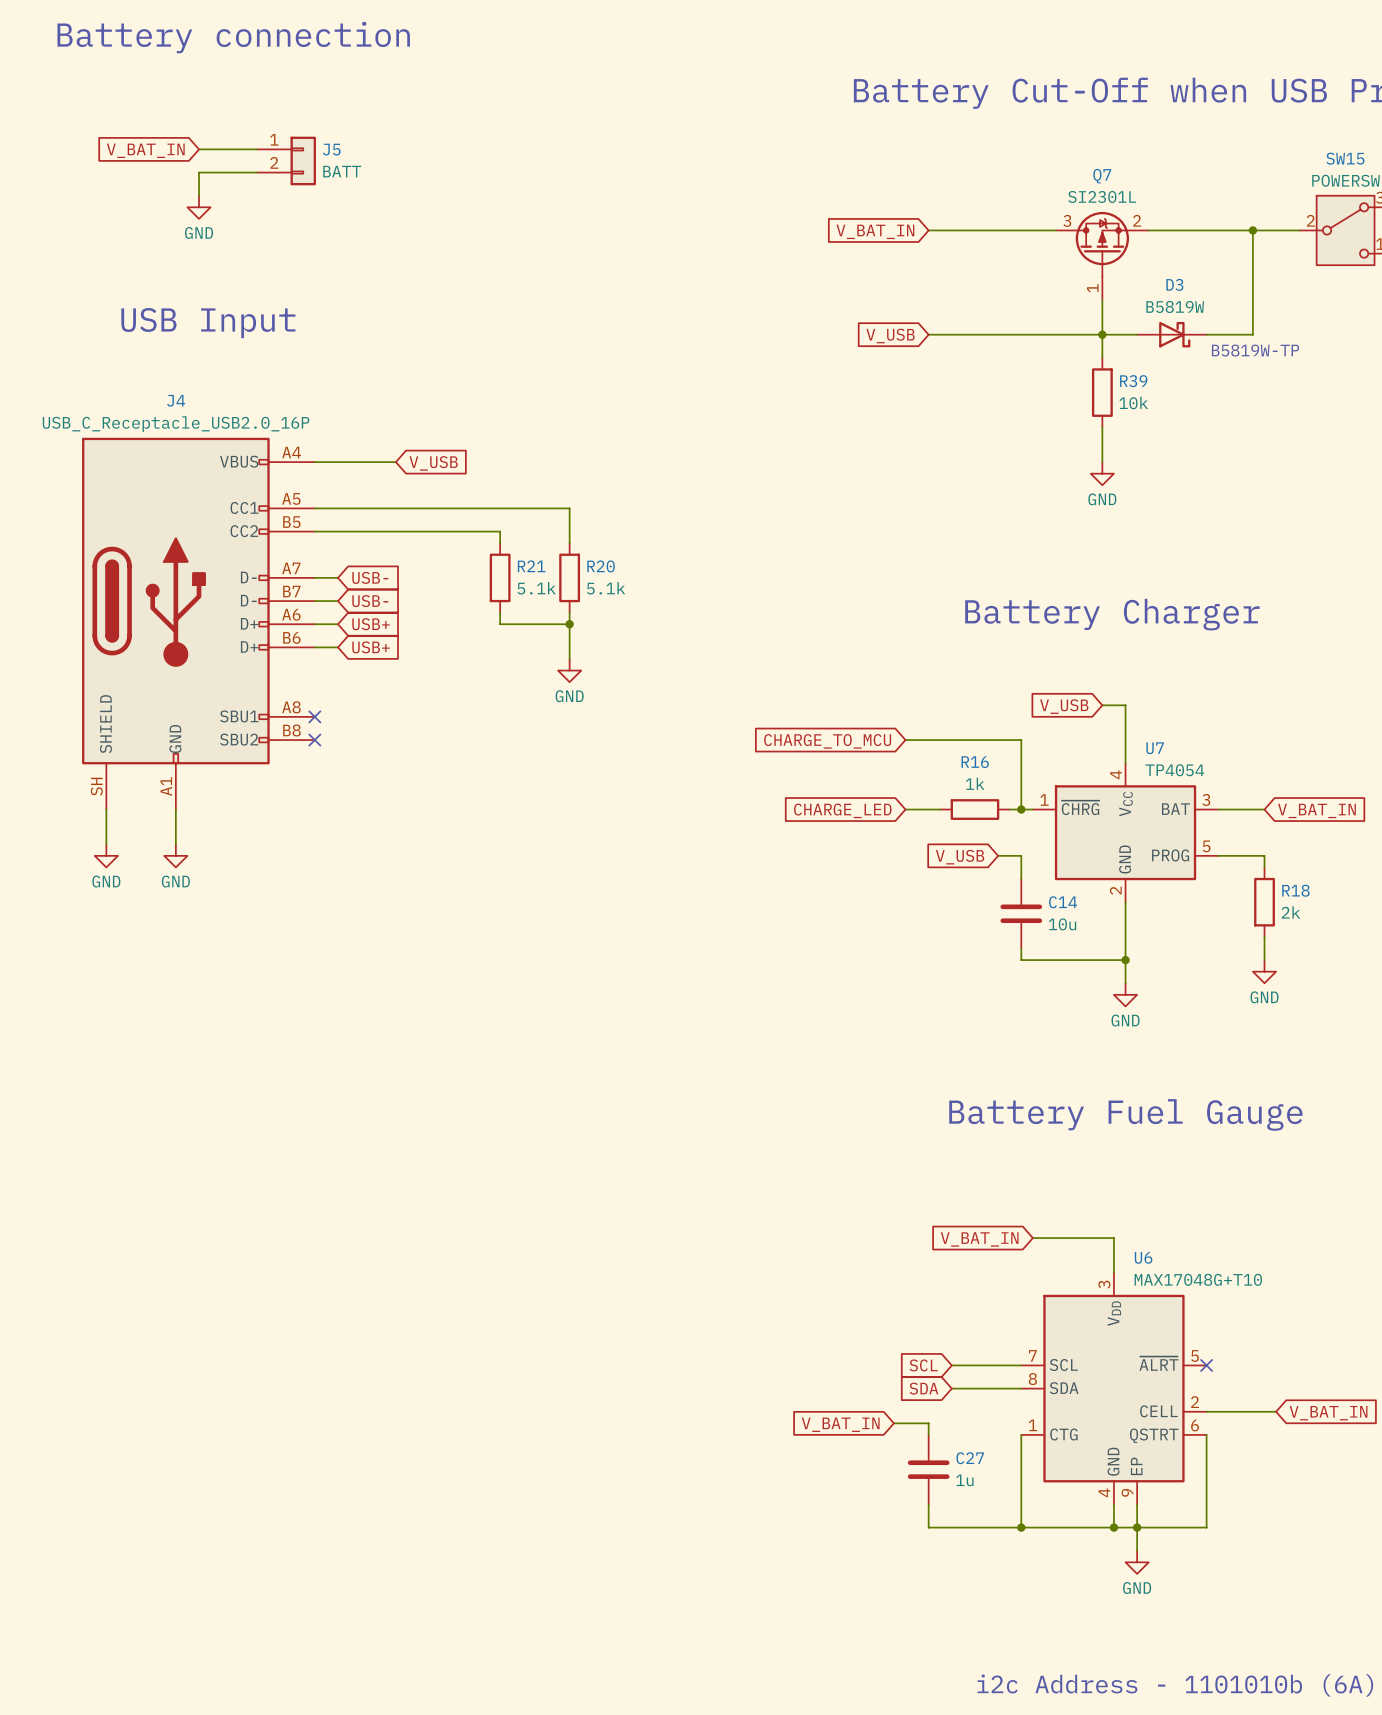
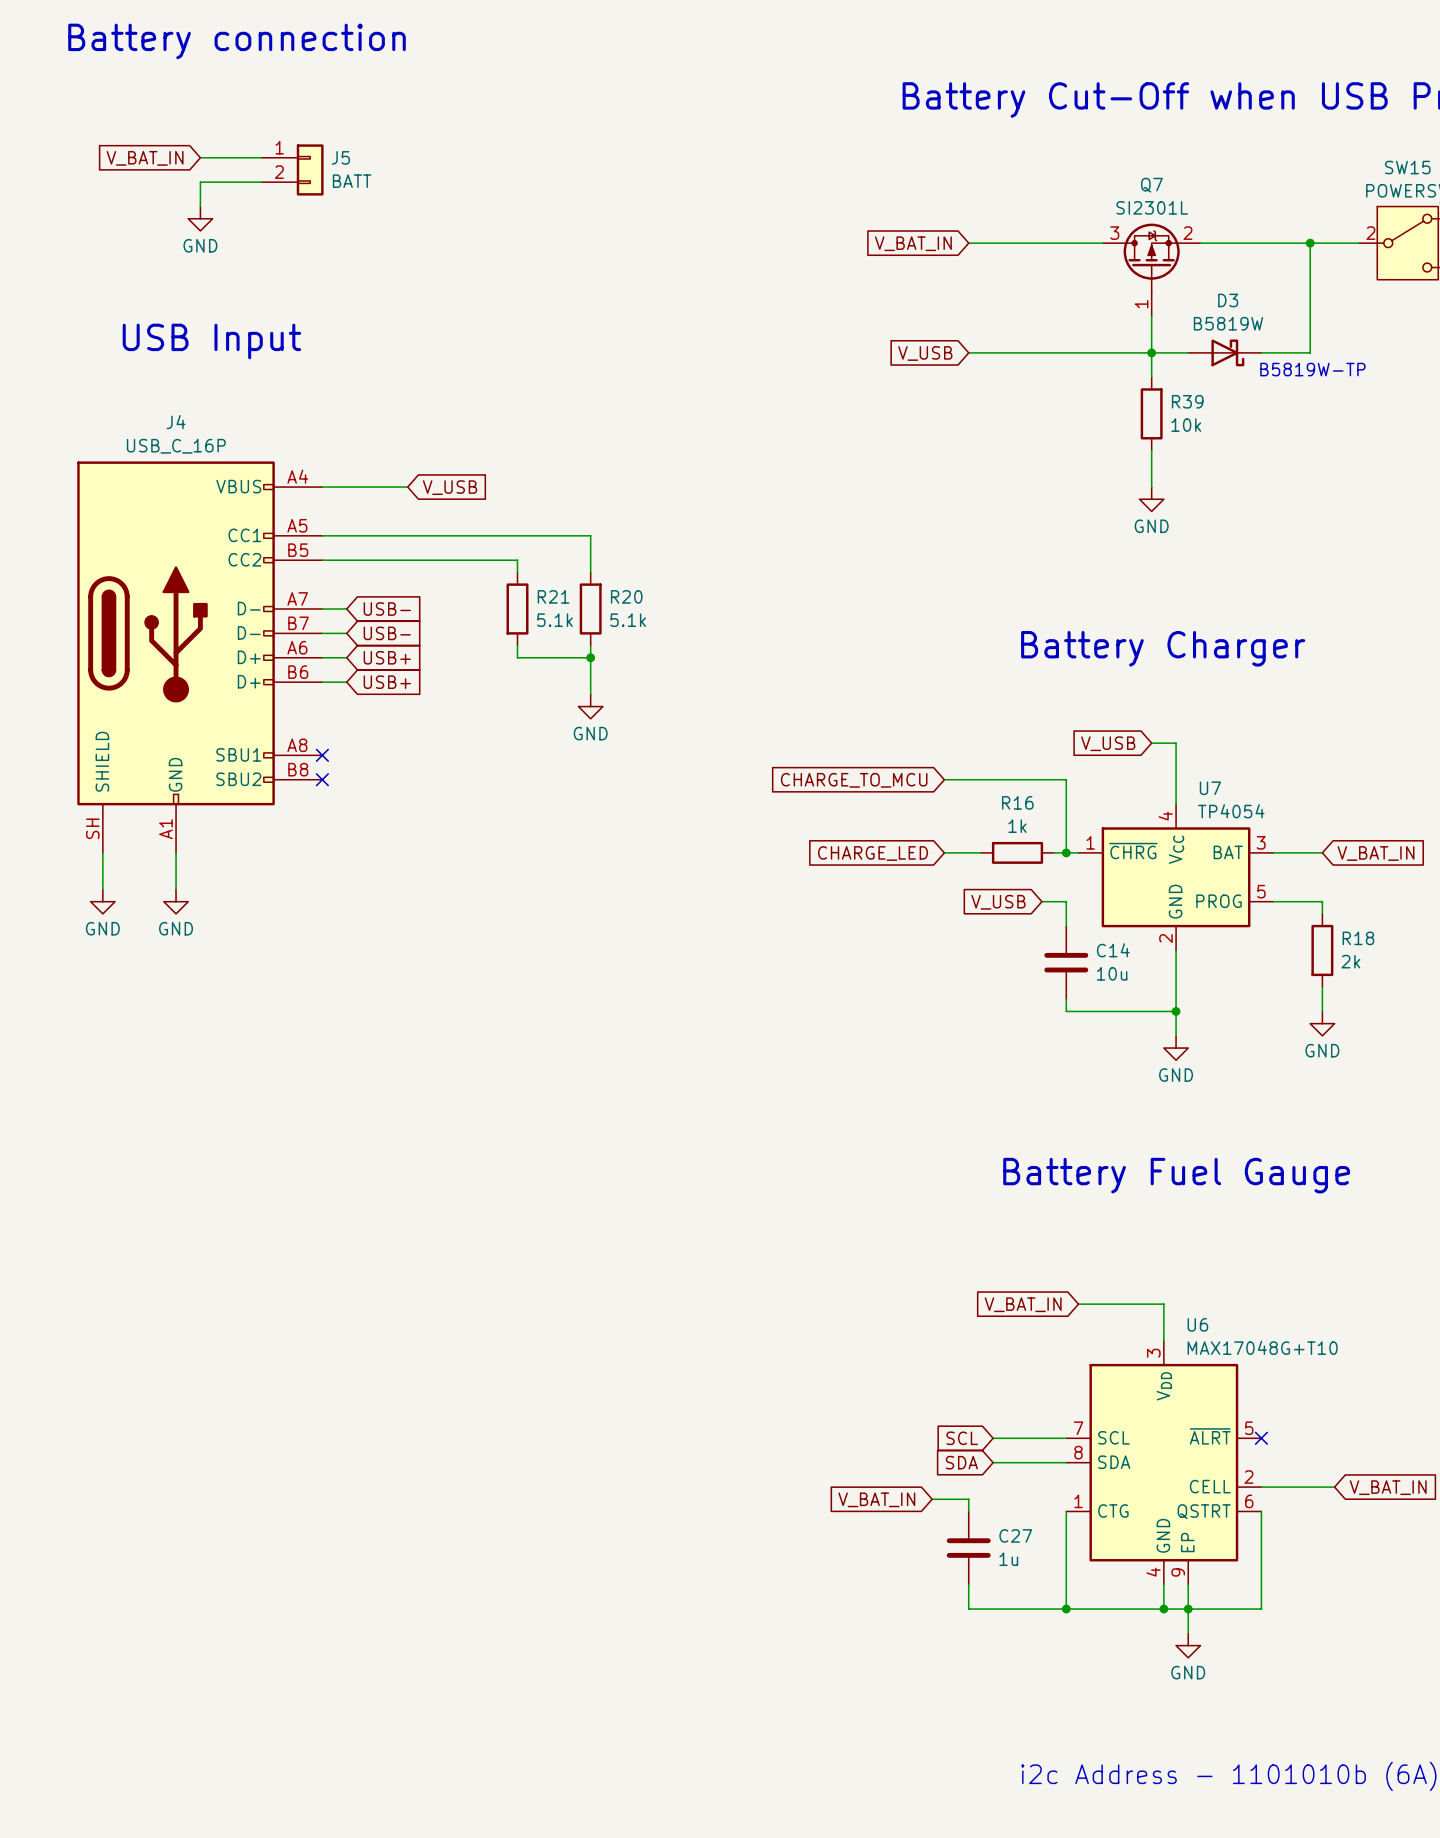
J4 value: USB_C_Receptacle_USB2.0_16P (176, 424) -> USB_C_16P (176, 446)

